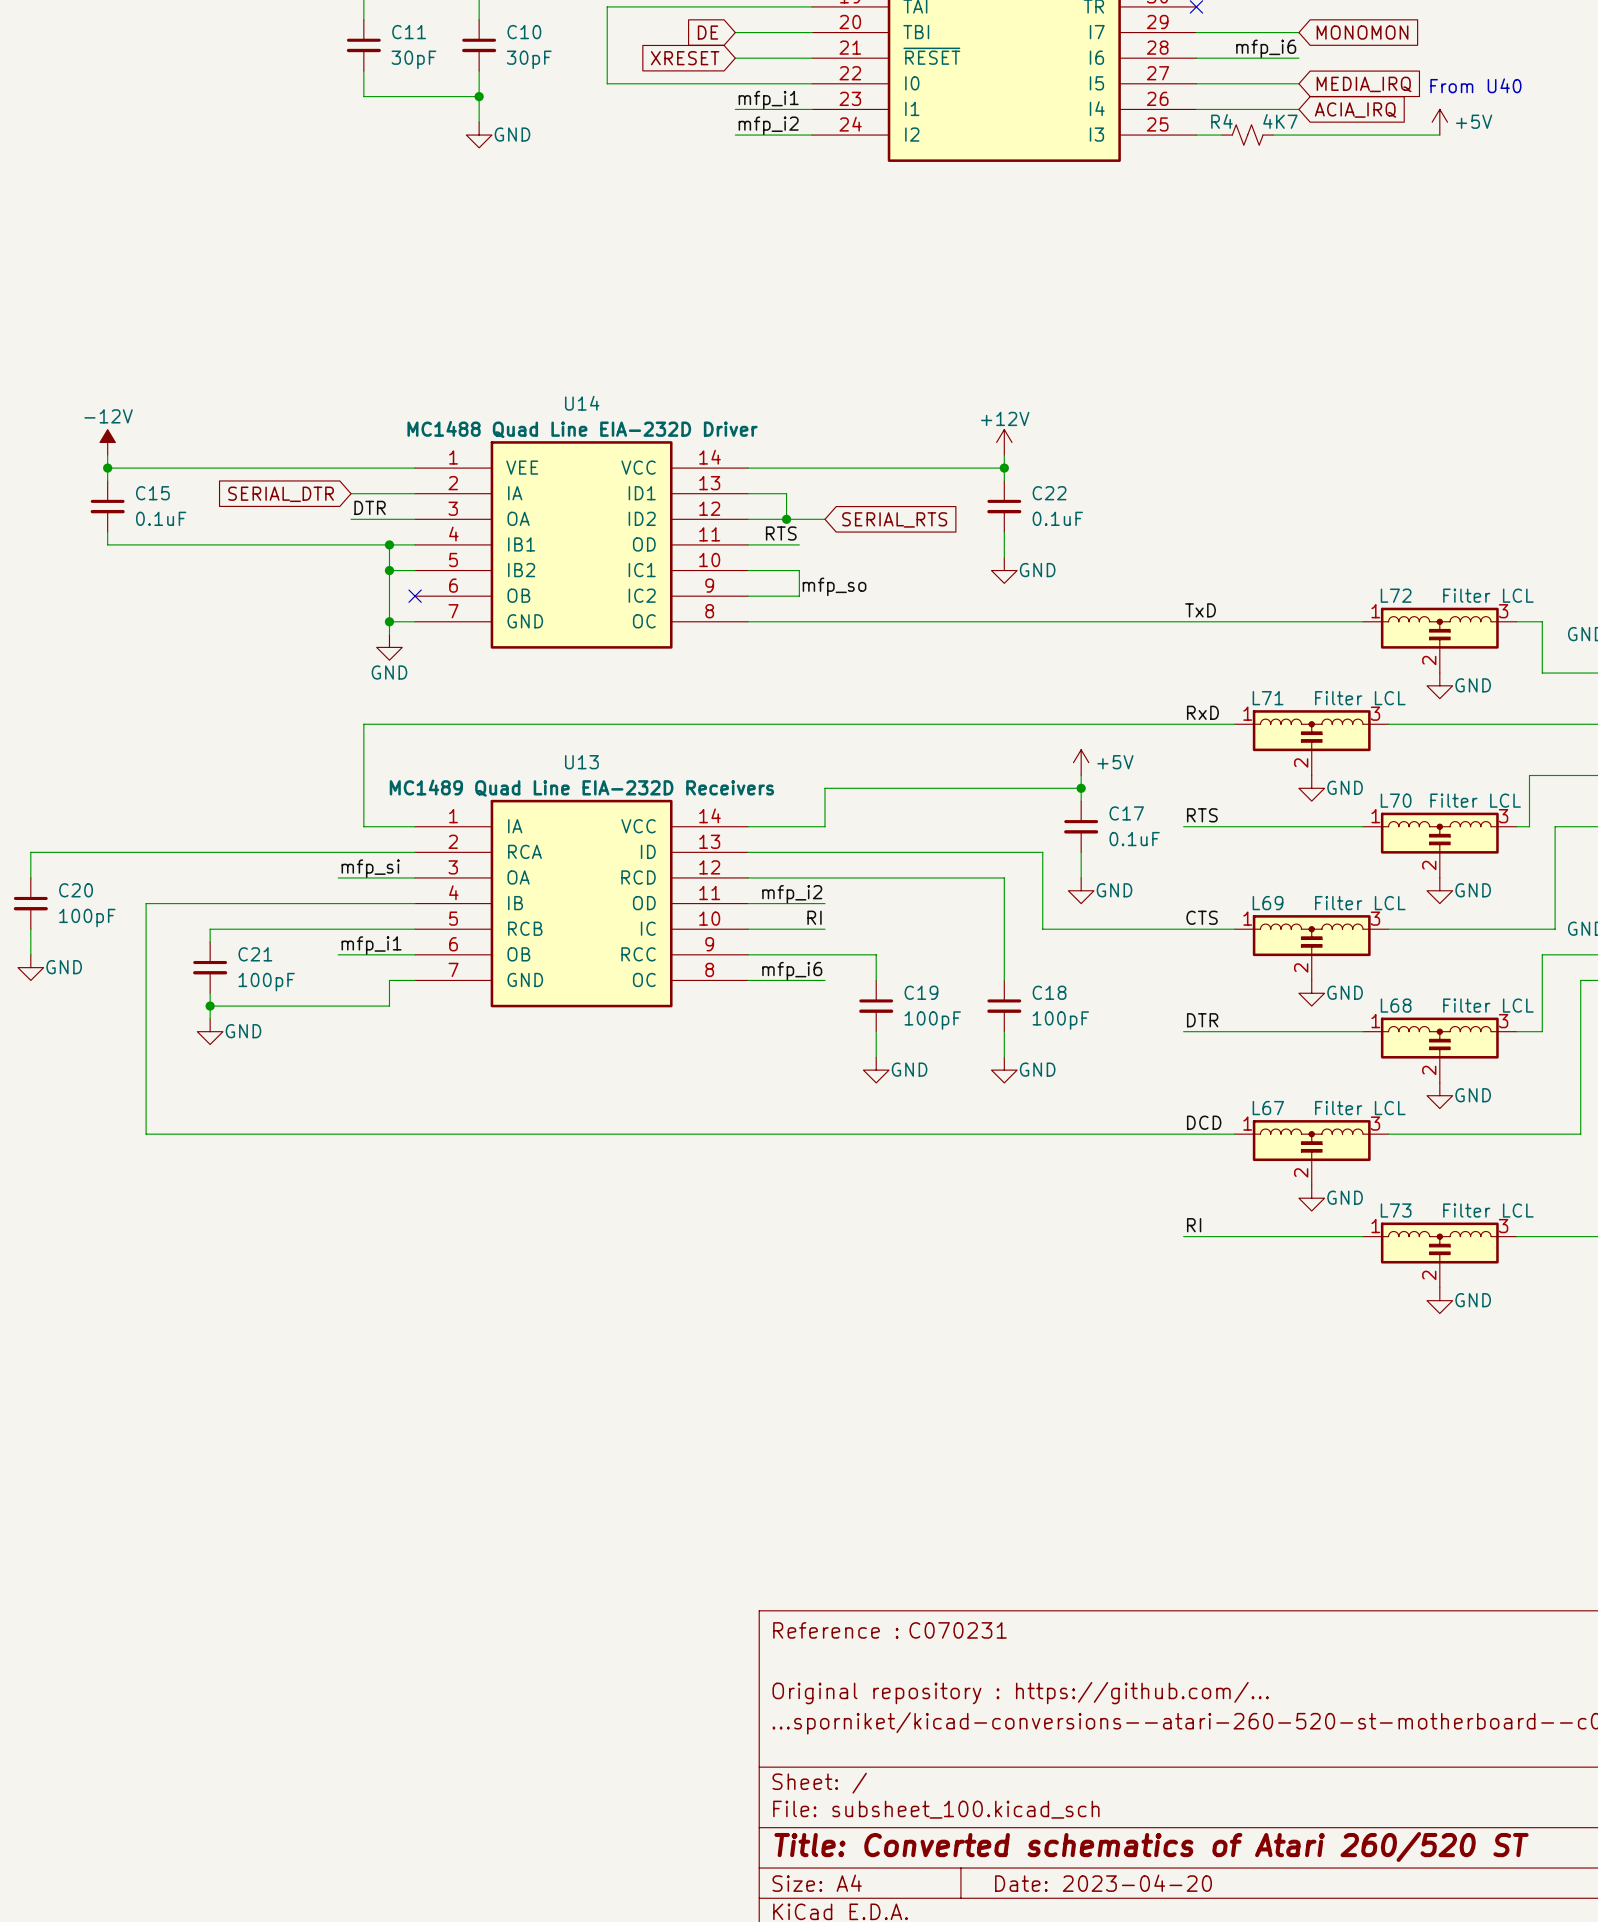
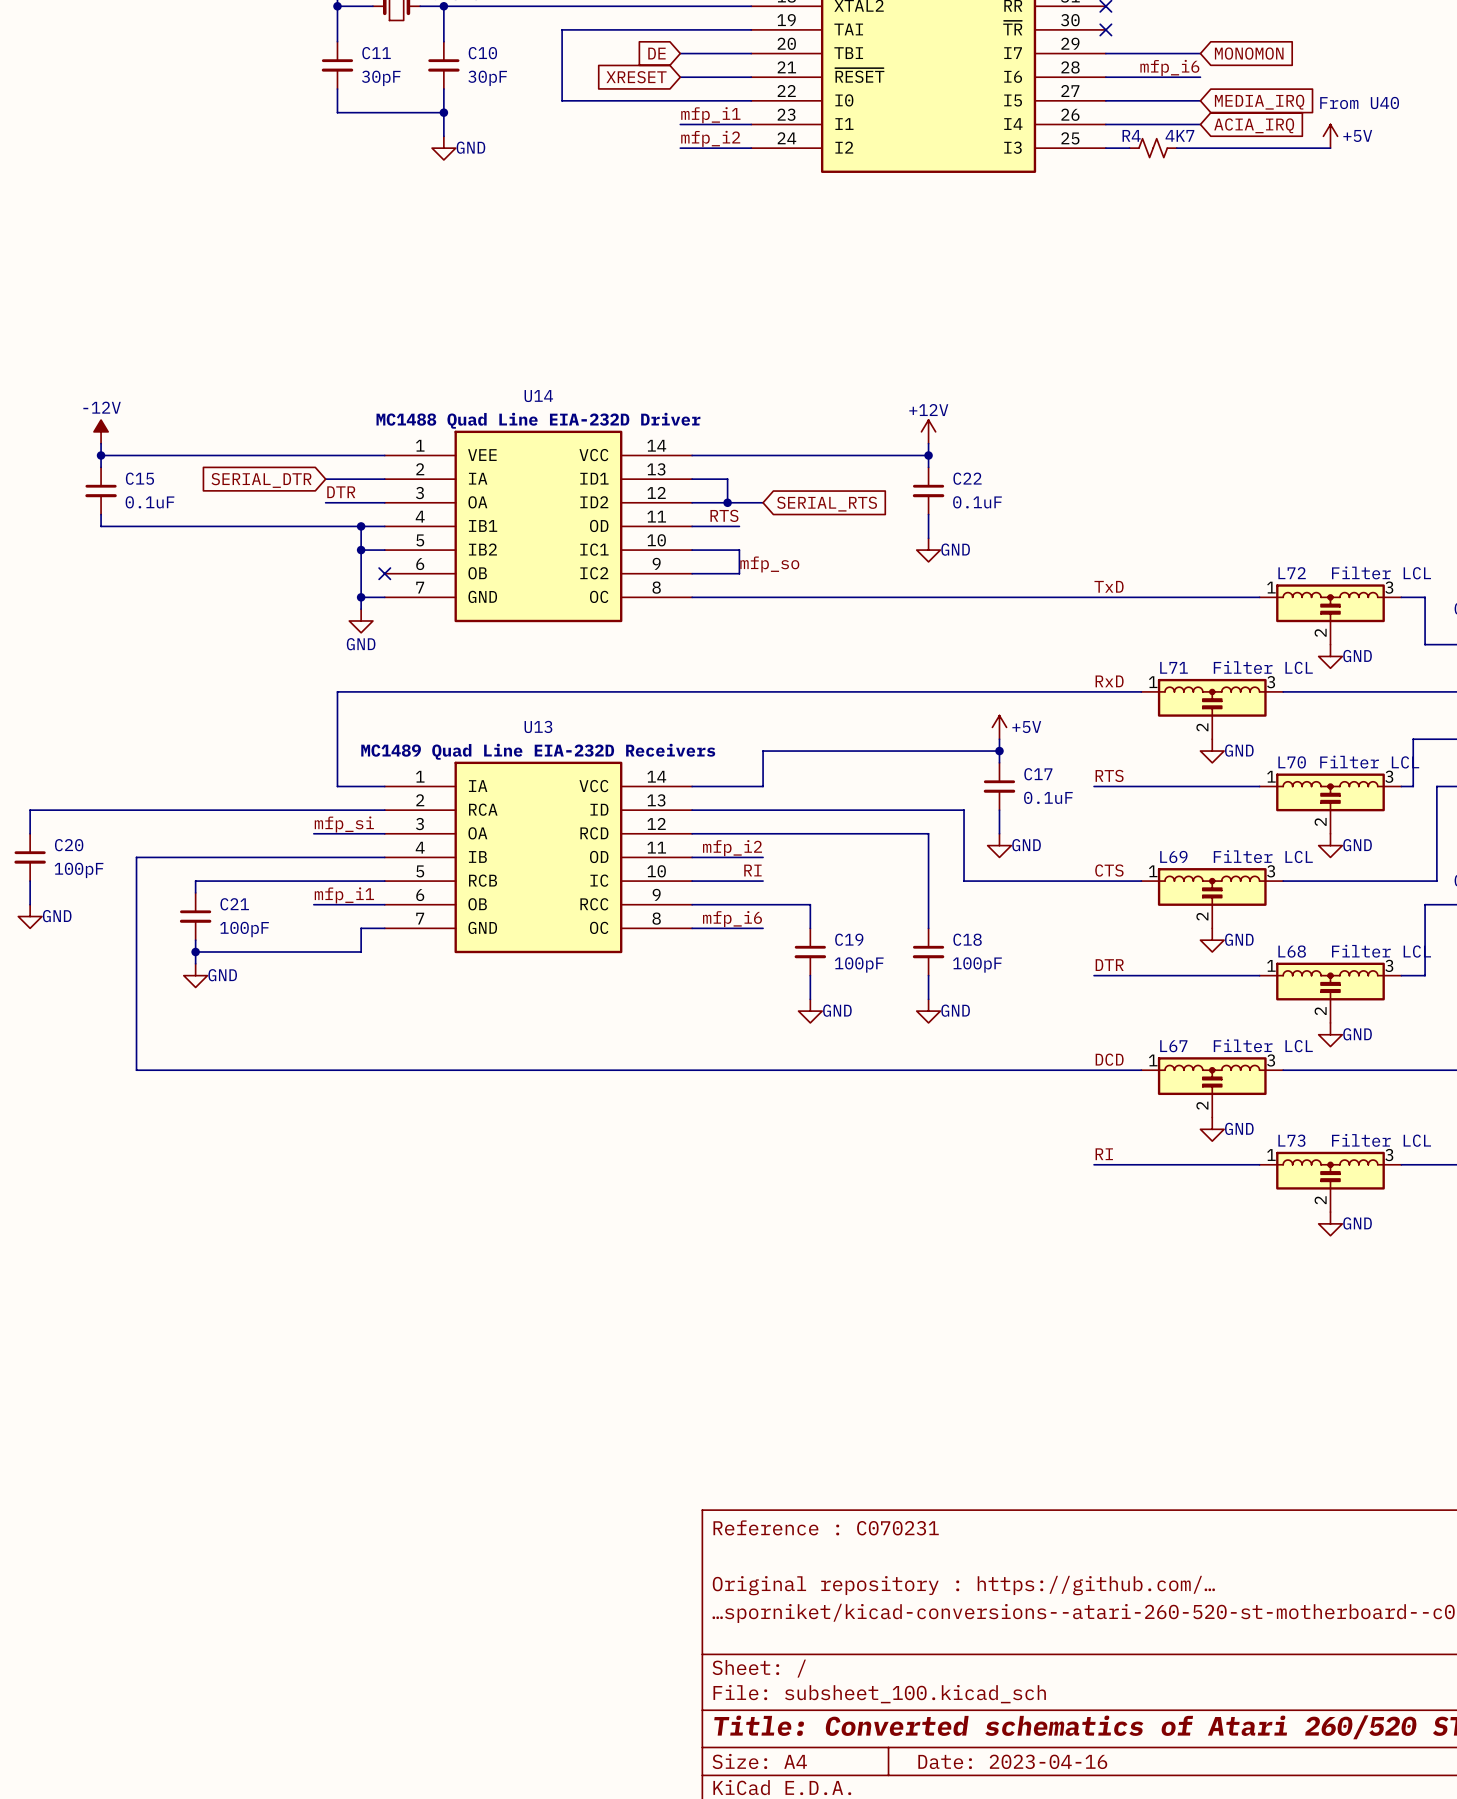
title block: Date: 2023-04-20 (1103, 1883) -> Date: 2023-04-16 (1012, 1761)

